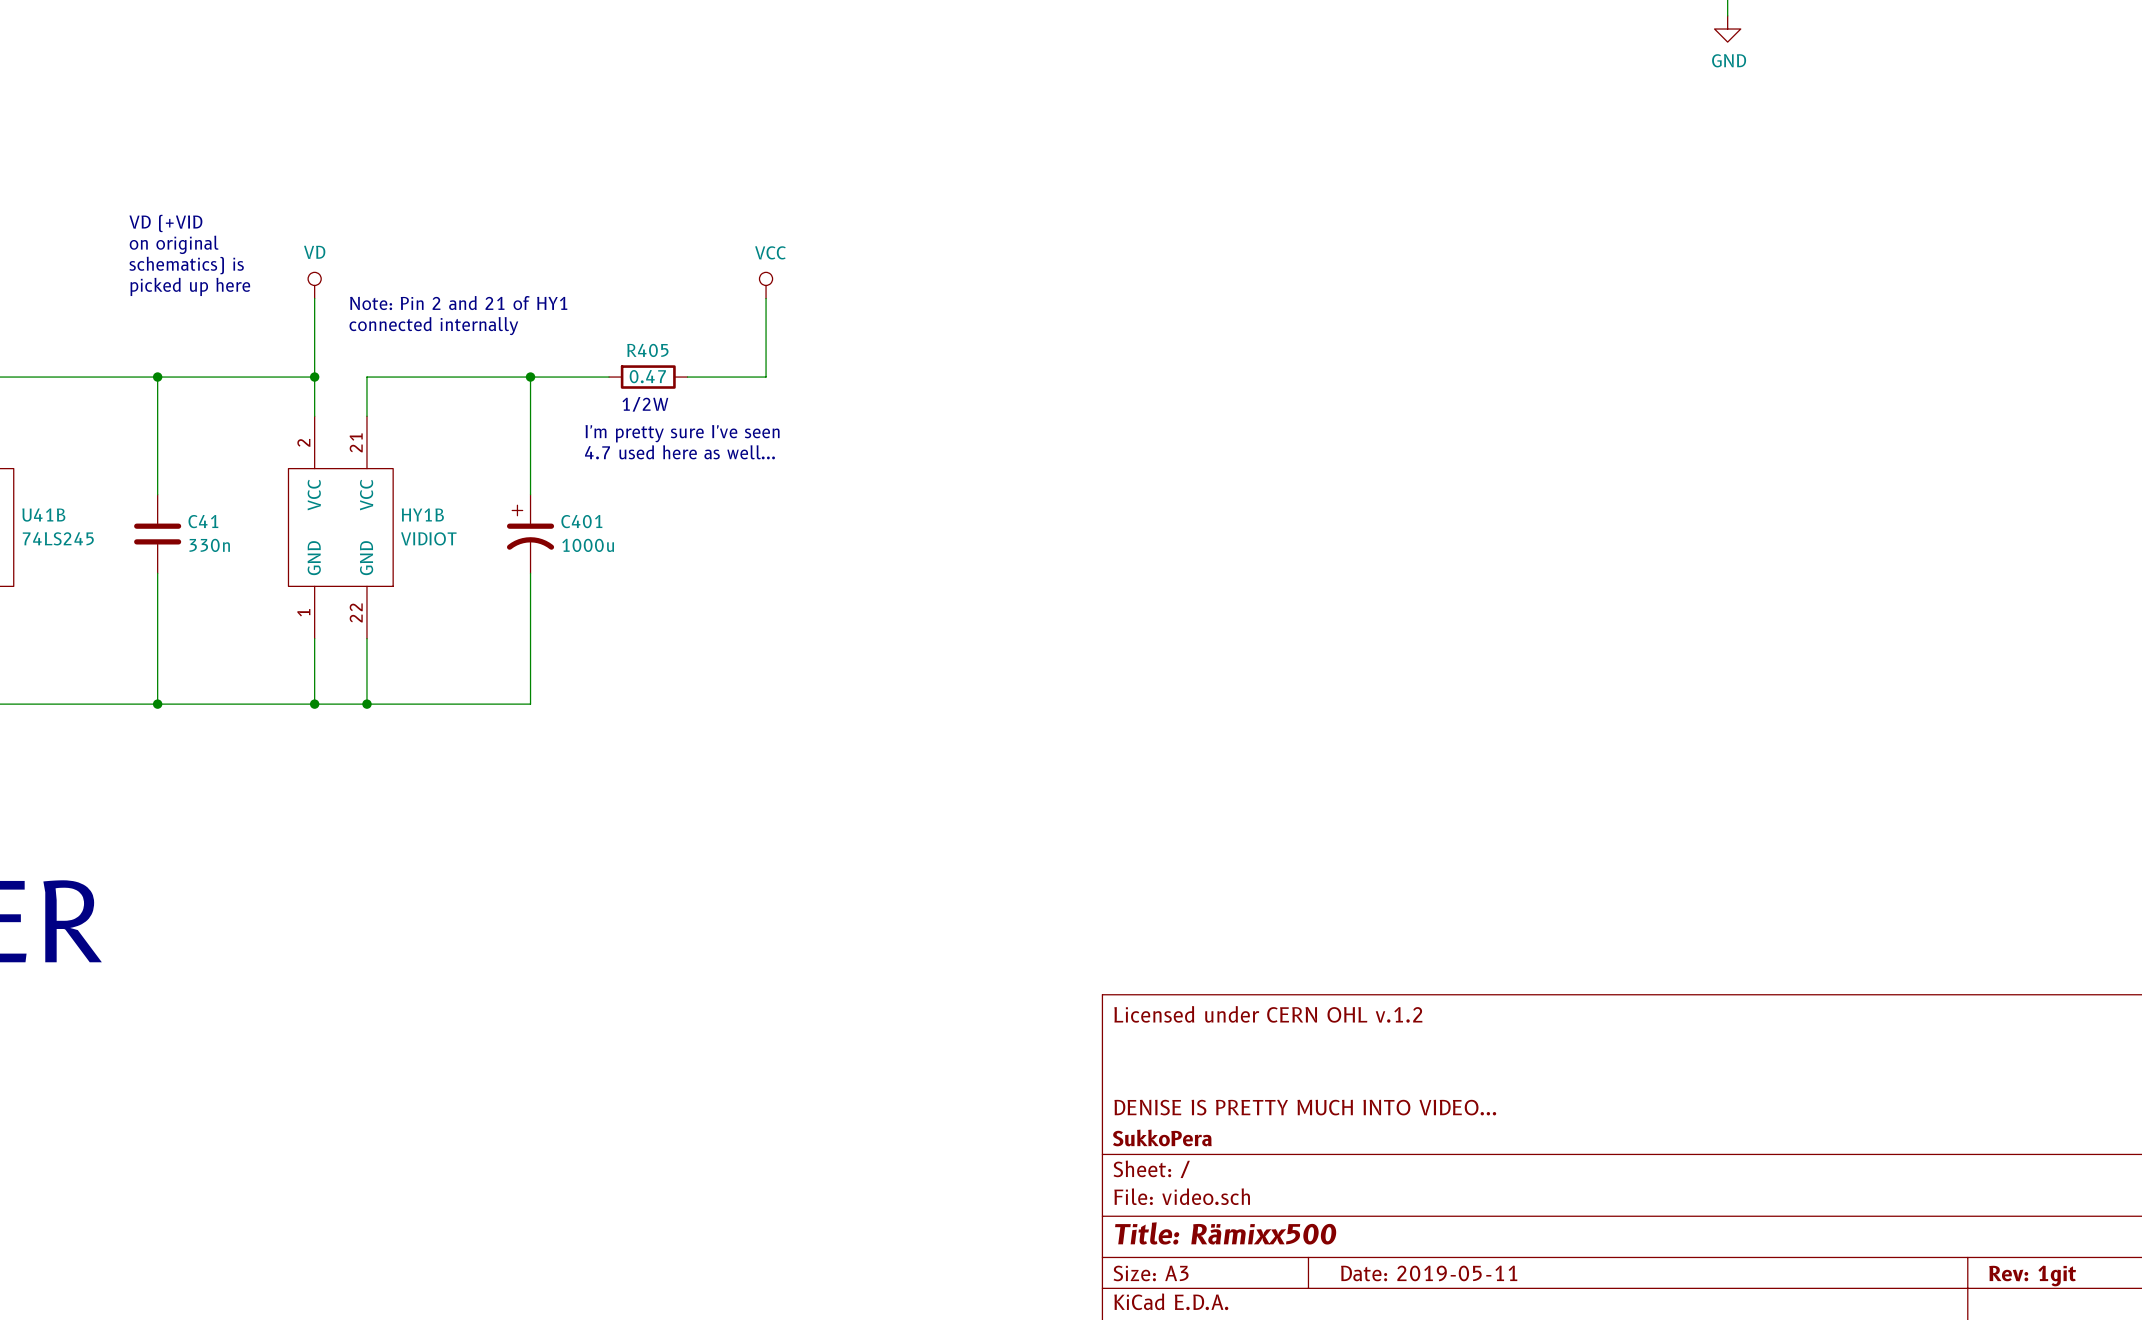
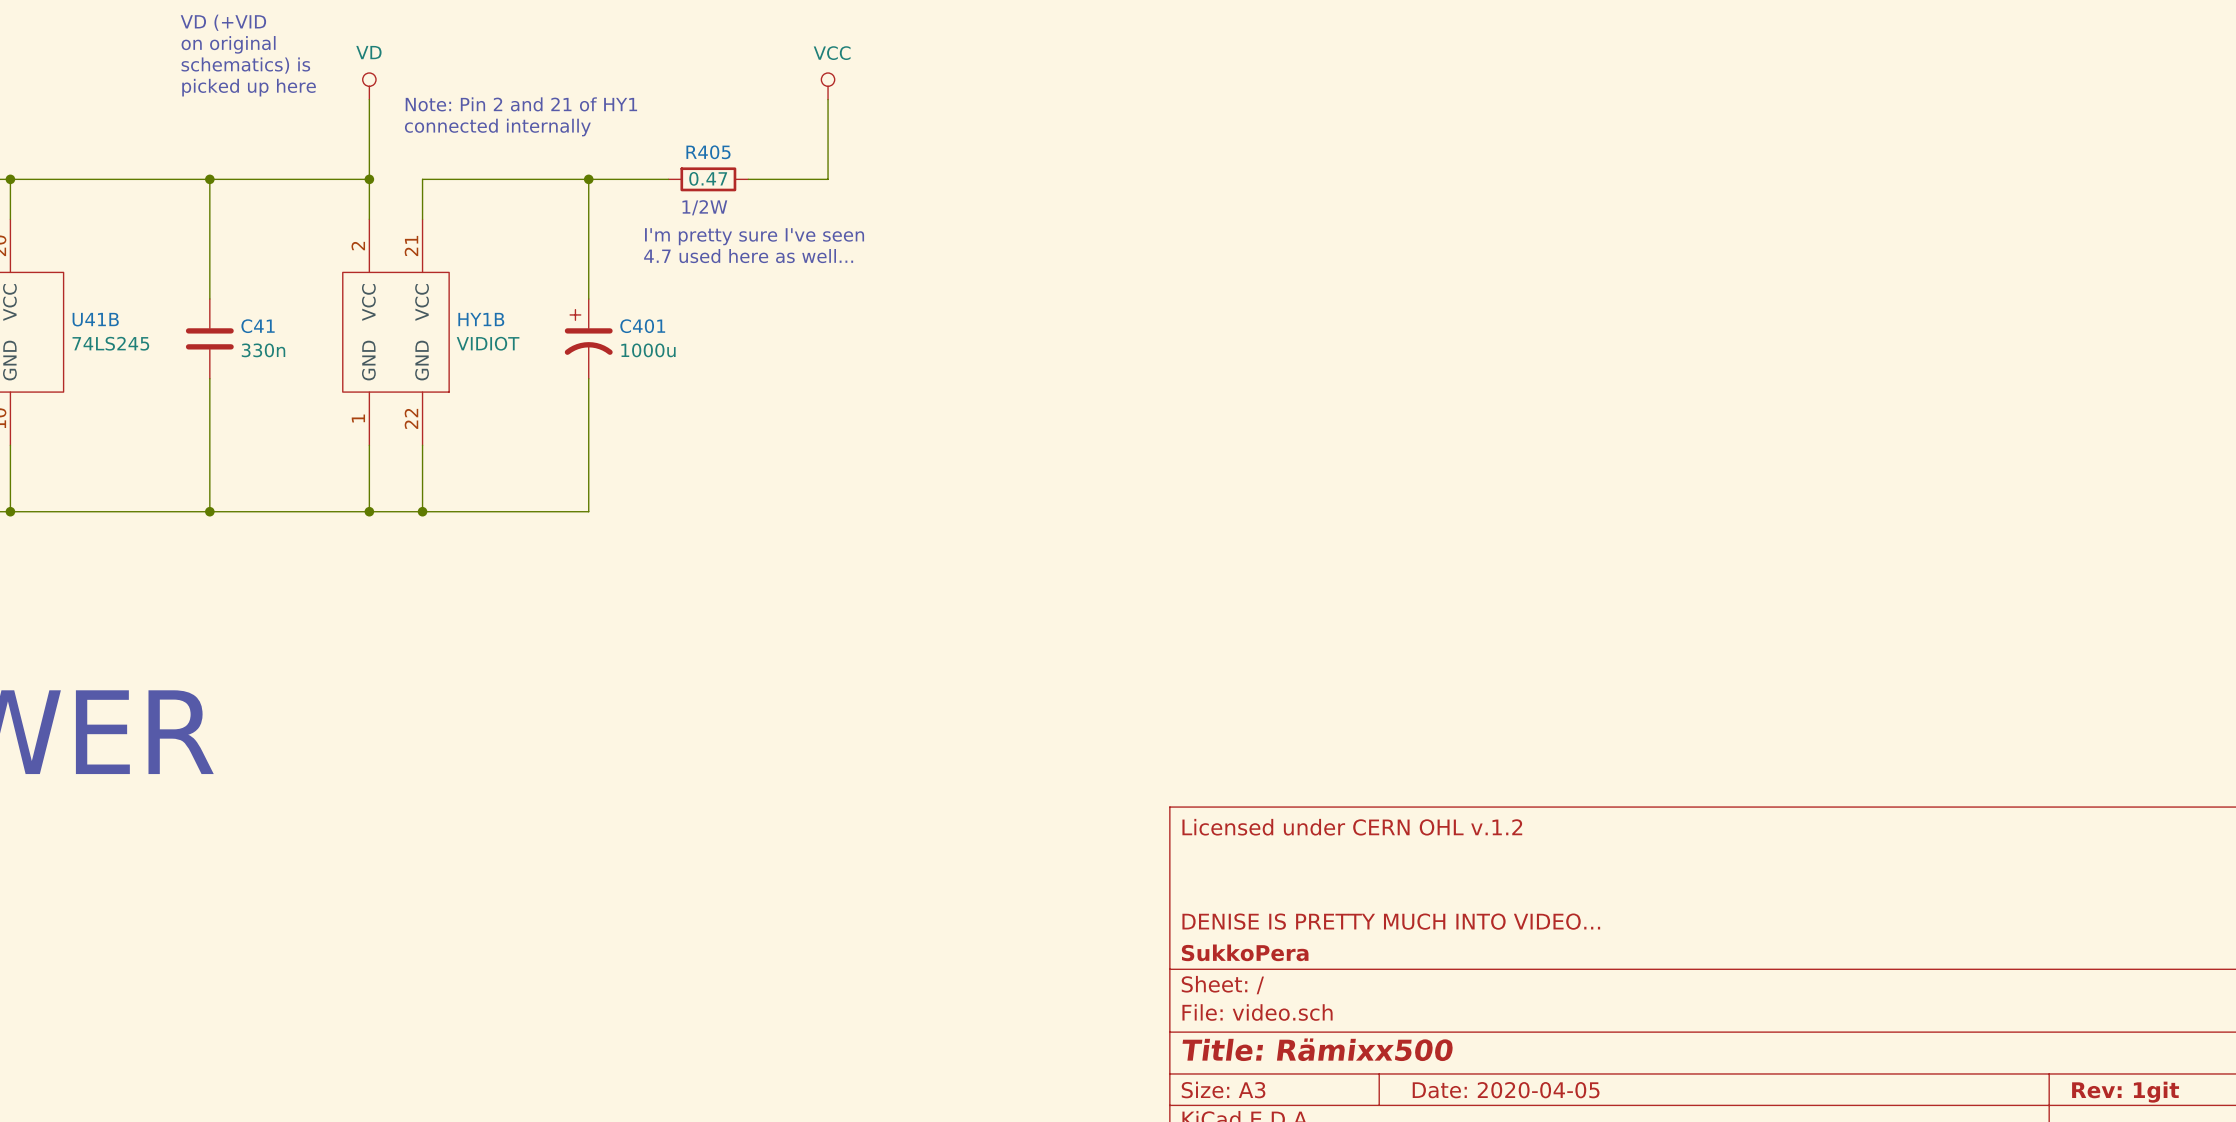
title block: Date: 2019-05-11 (1429, 1273) -> Date: 2020-04-05 (1506, 1090)

